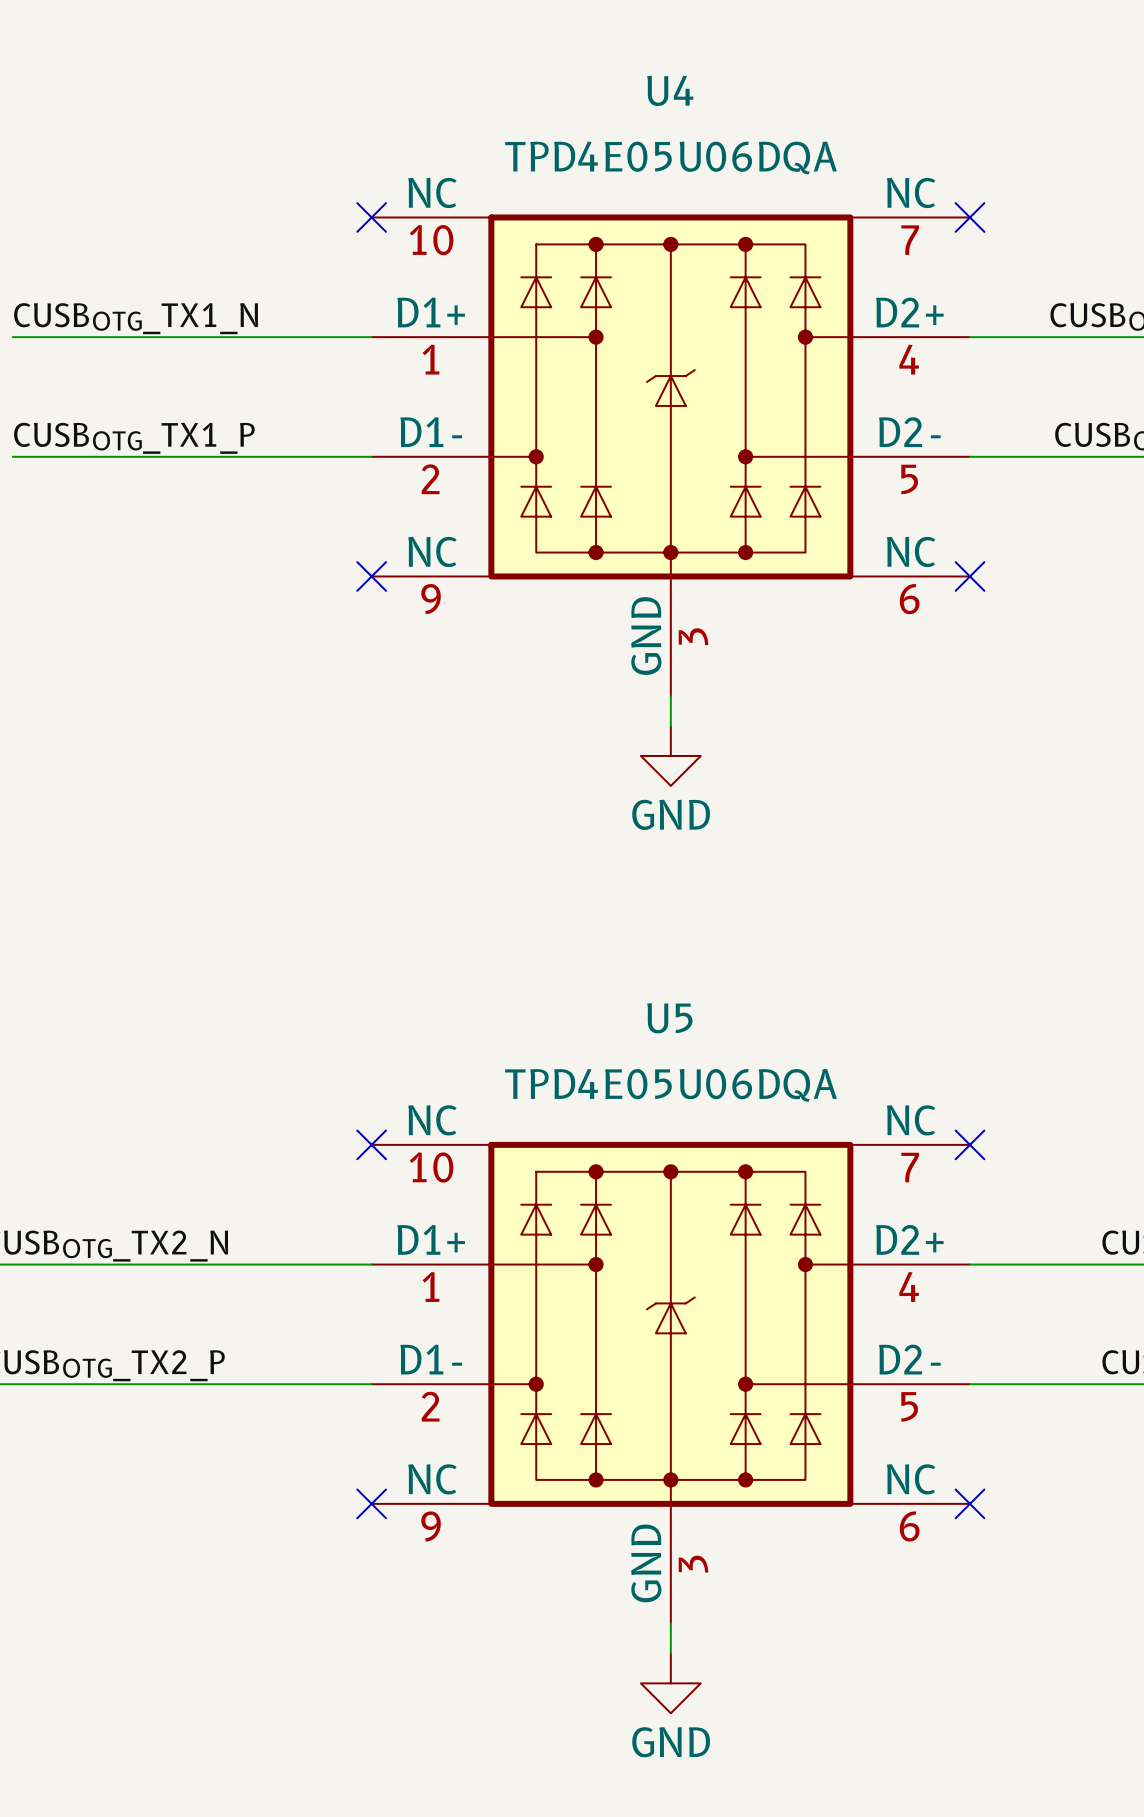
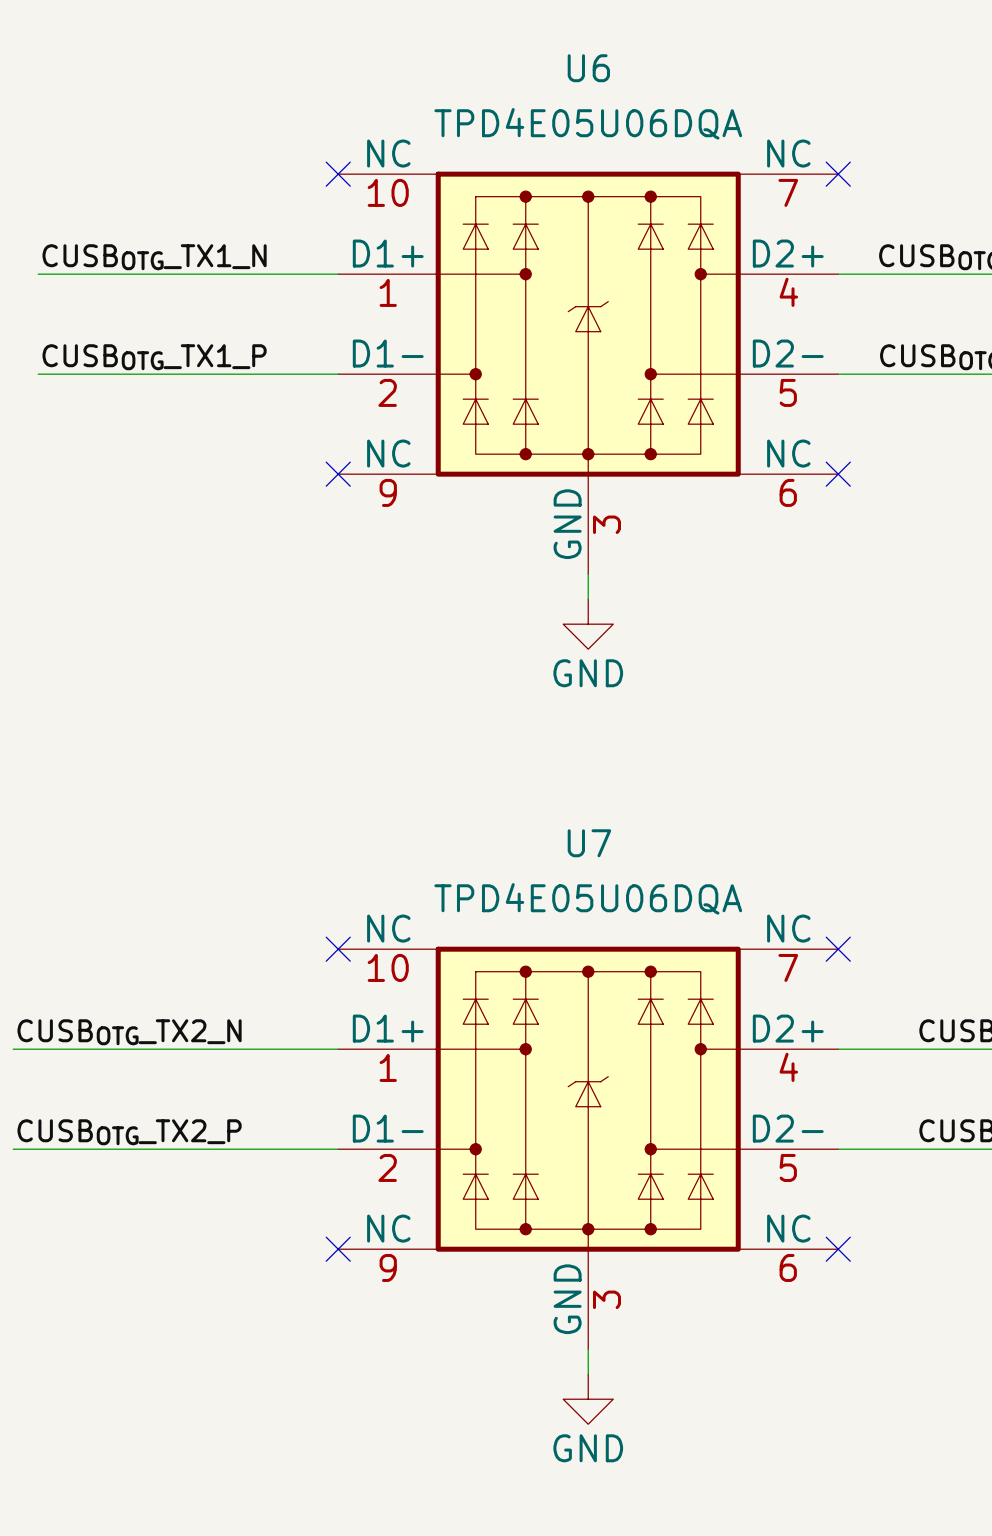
U4 name: U4 (670, 90) -> U6 (588, 68)
U5 name: U5 (669, 1018) -> U7 (589, 843)

